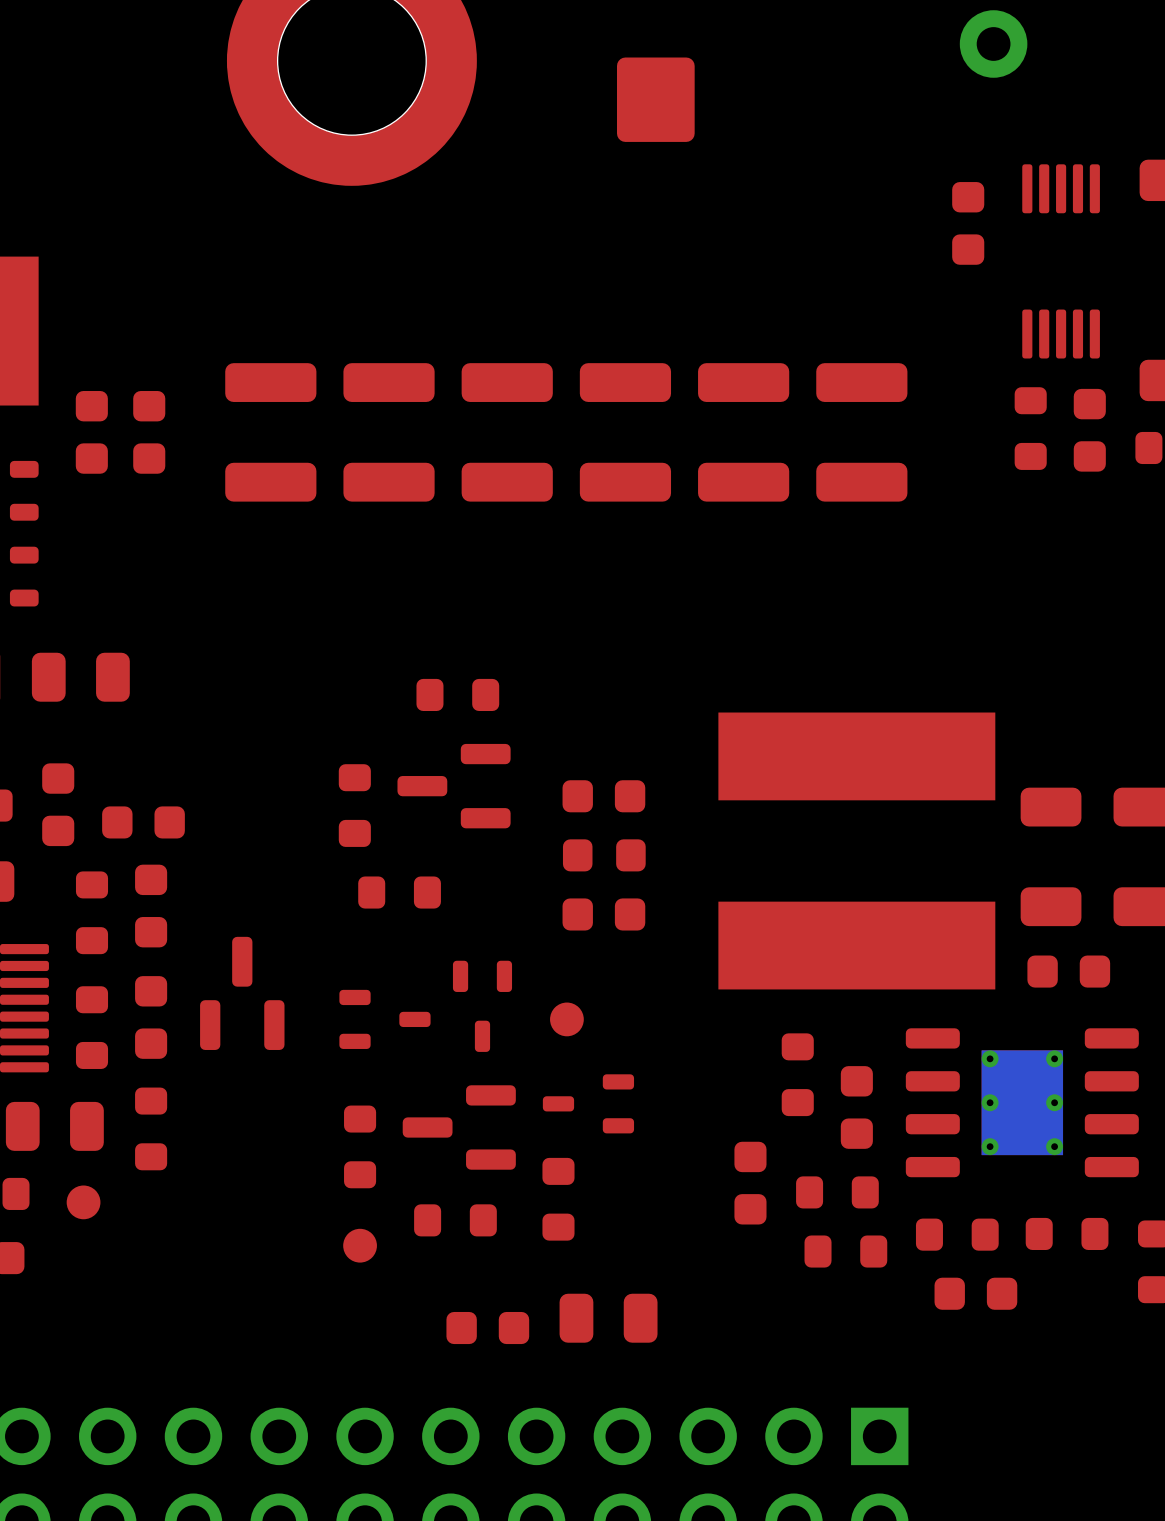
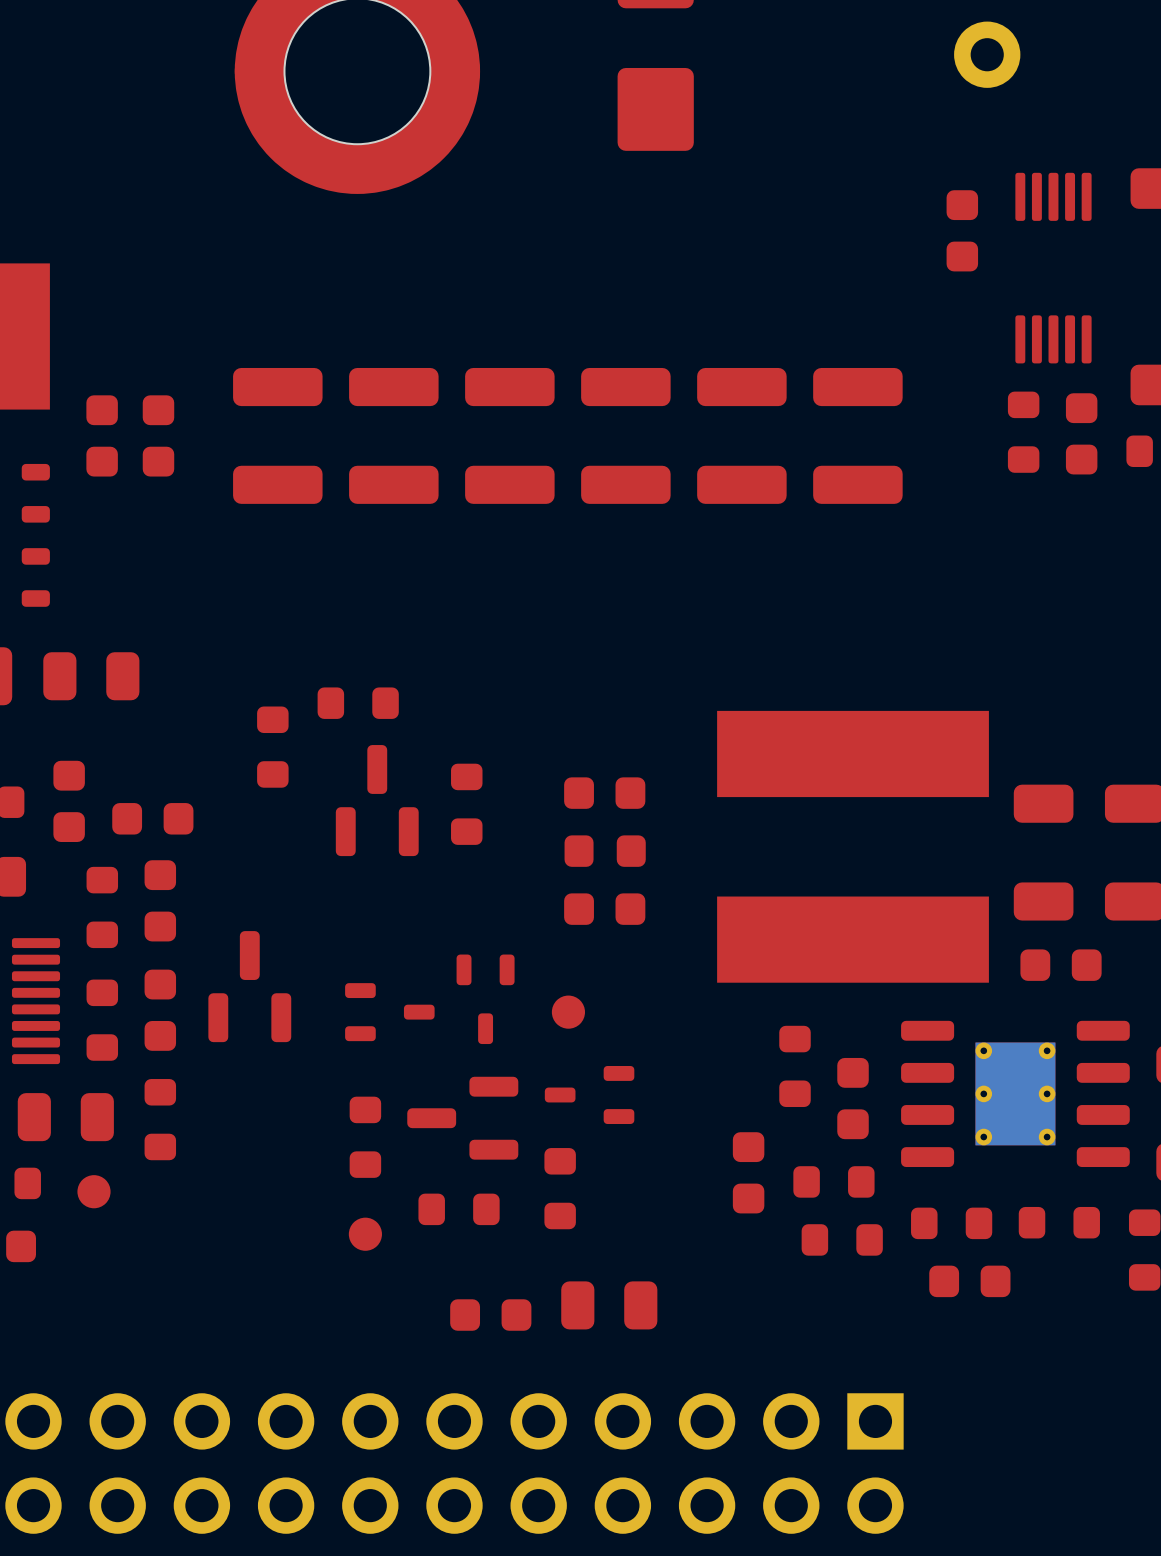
part: (457, 694) -> none
part: none -> (358, 703)
part footprint: [397, 743, 511, 829] -> [451, 763, 483, 845]
part: none -> (272, 747)
part footprint: [338, 764, 371, 847] -> [335, 745, 419, 857]
part: (399, 892) -> none

